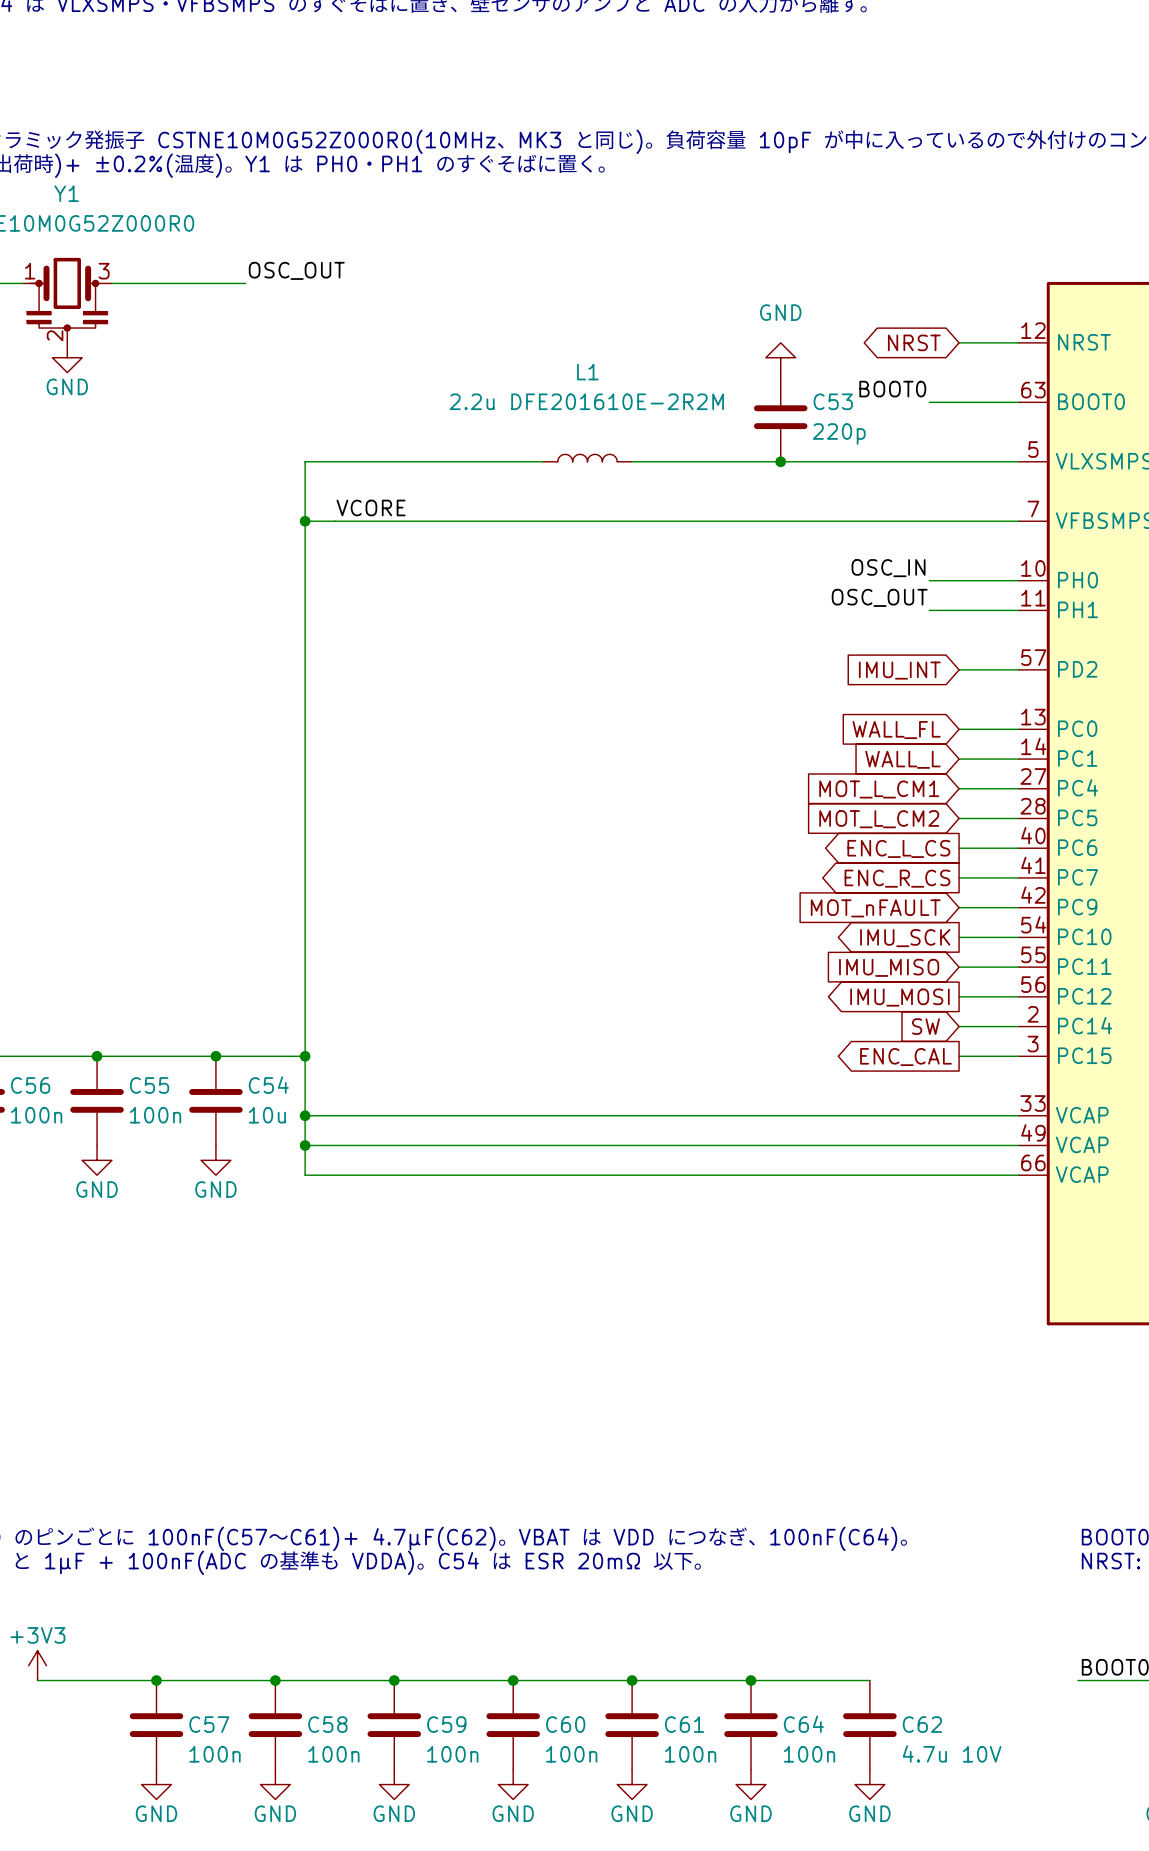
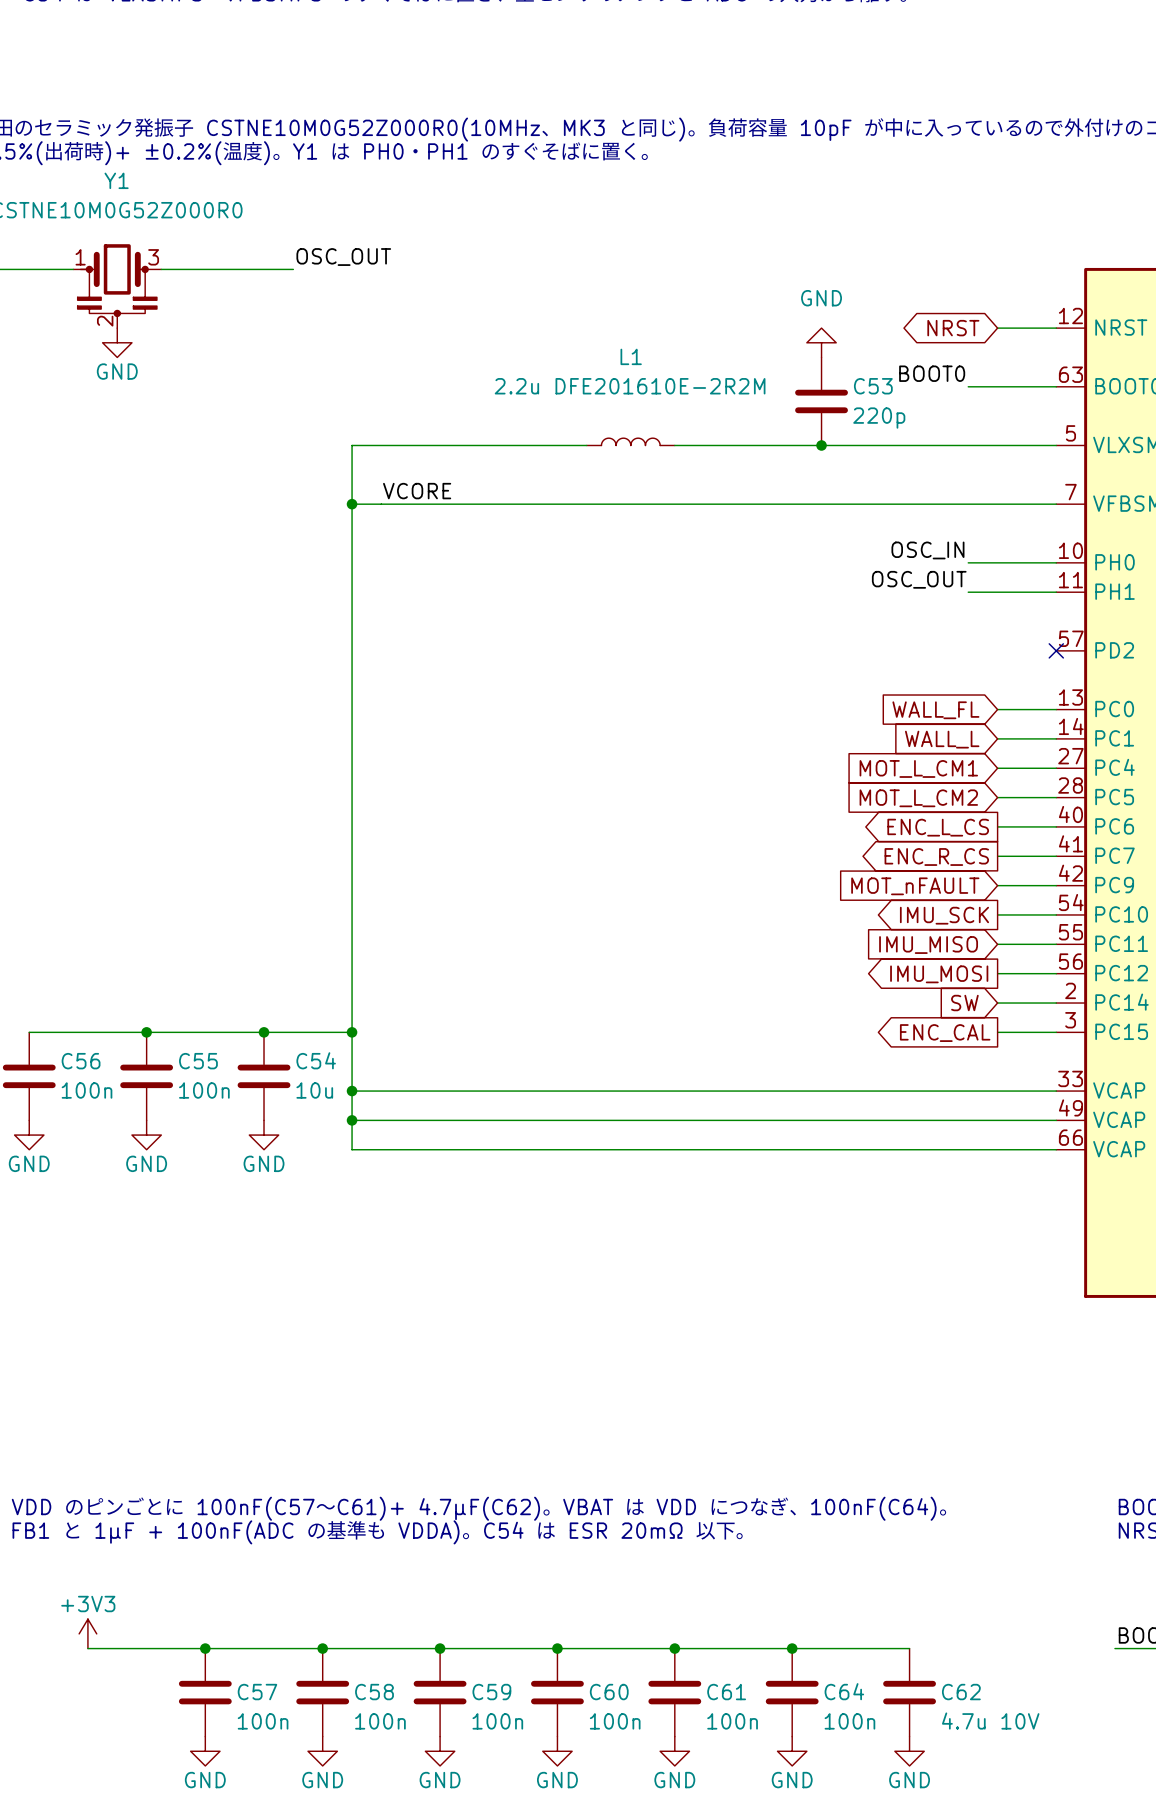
wire: (959, 669) (1018, 669) -> none
no-connect mark: none -> (1056, 650)
global label: IMU_INT (899, 670) -> none

